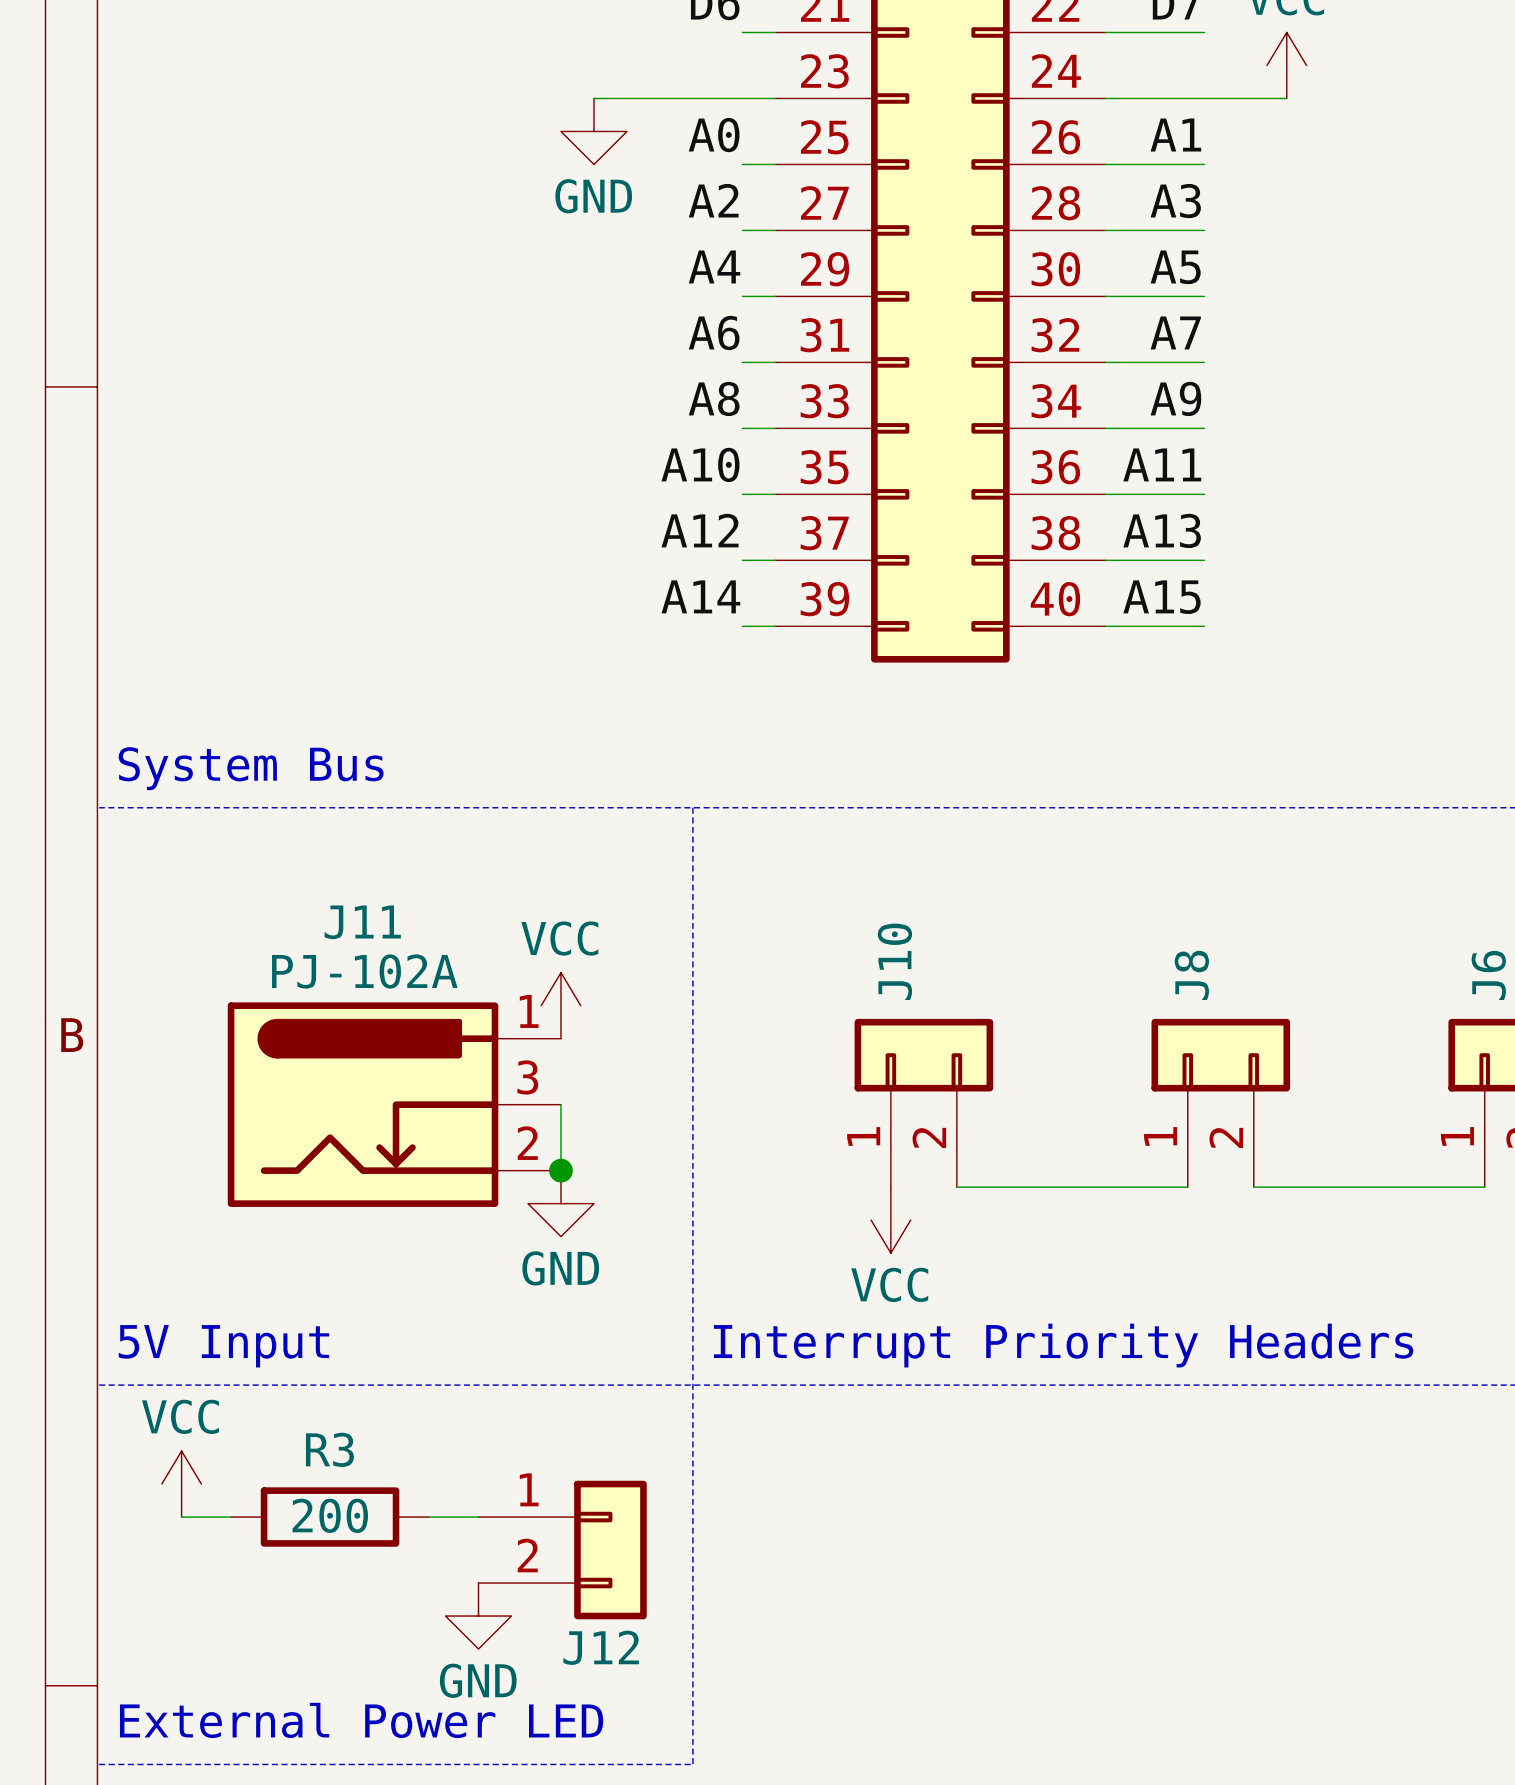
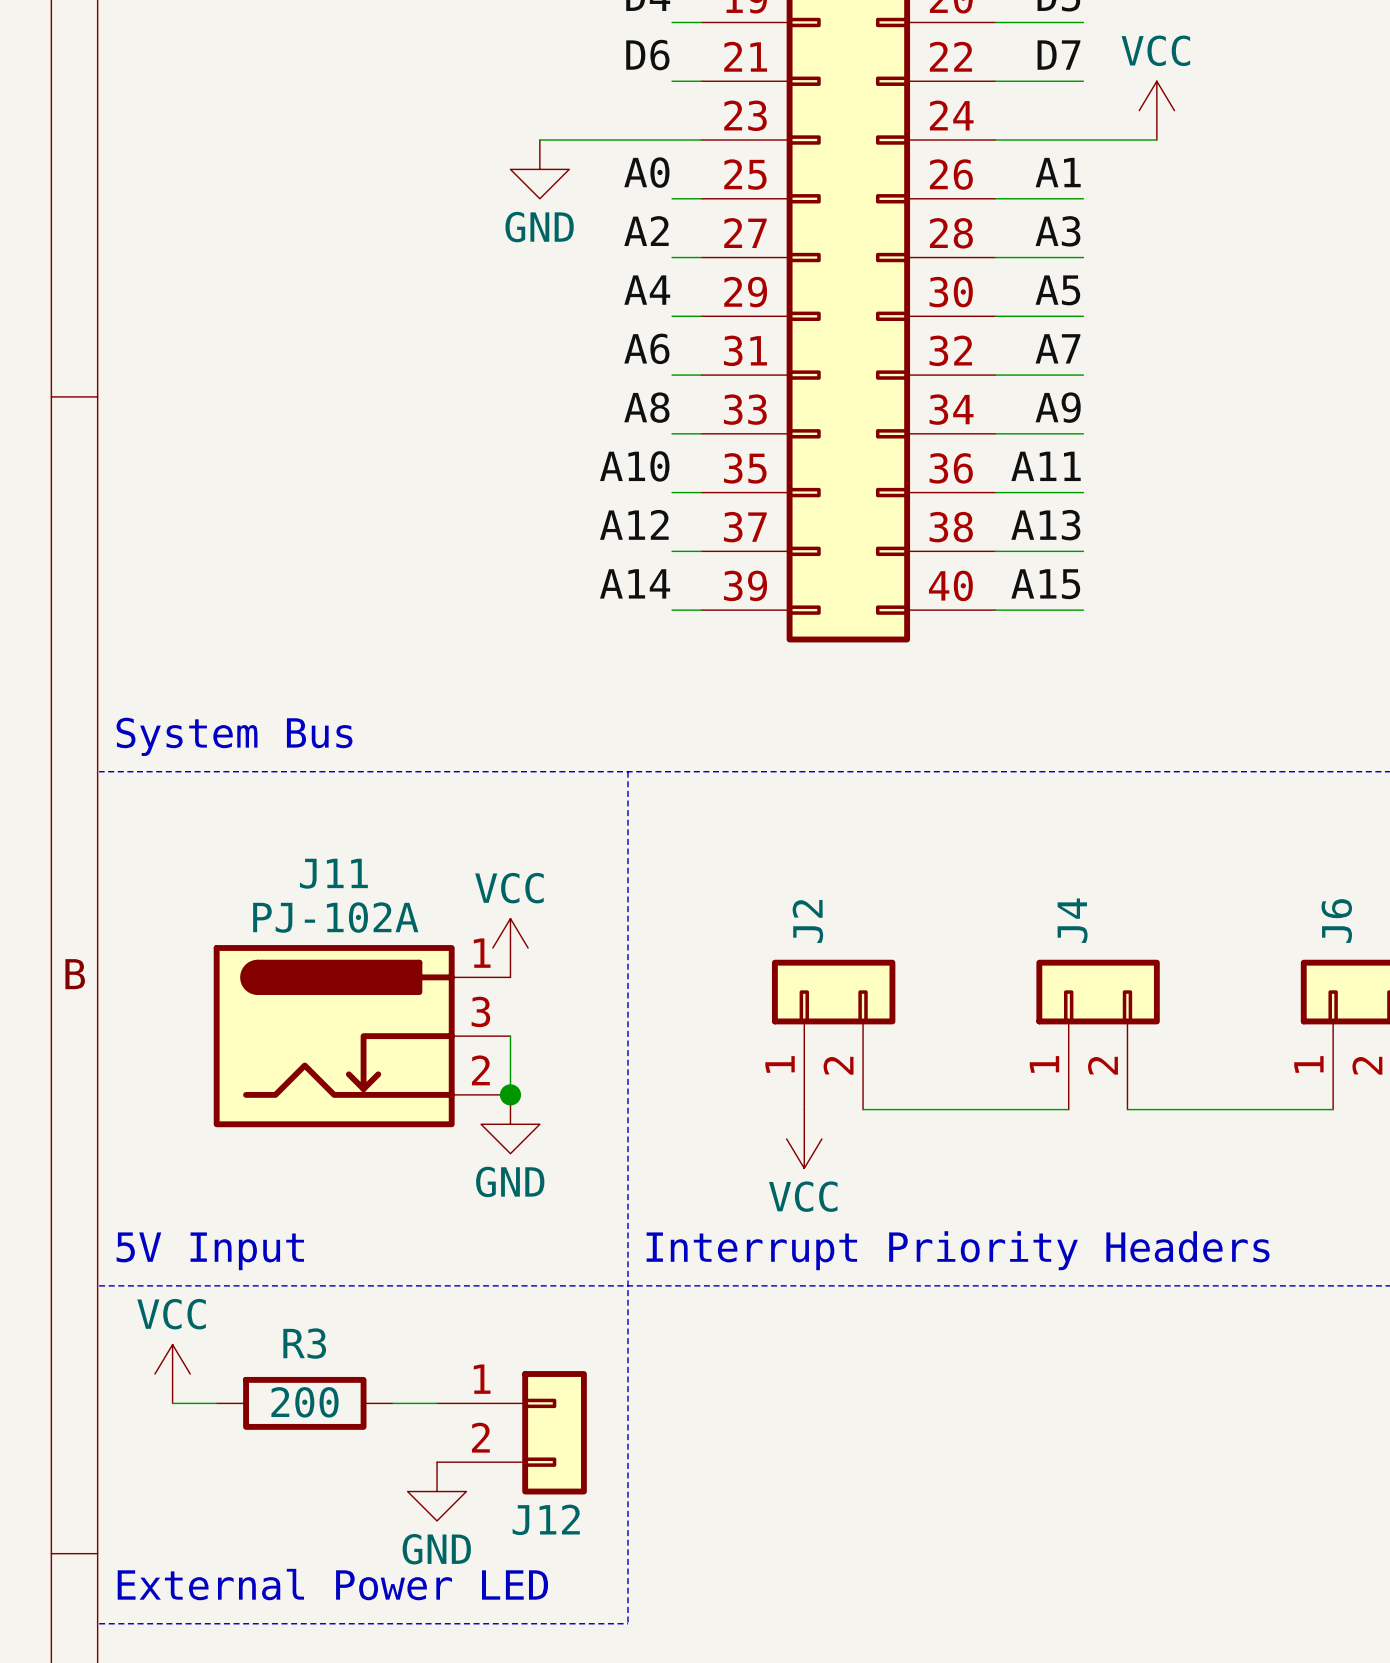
J10 name: J10 (894, 961) -> J2 (807, 921)
J8 name: J8 (1191, 975) -> J4 (1072, 920)

